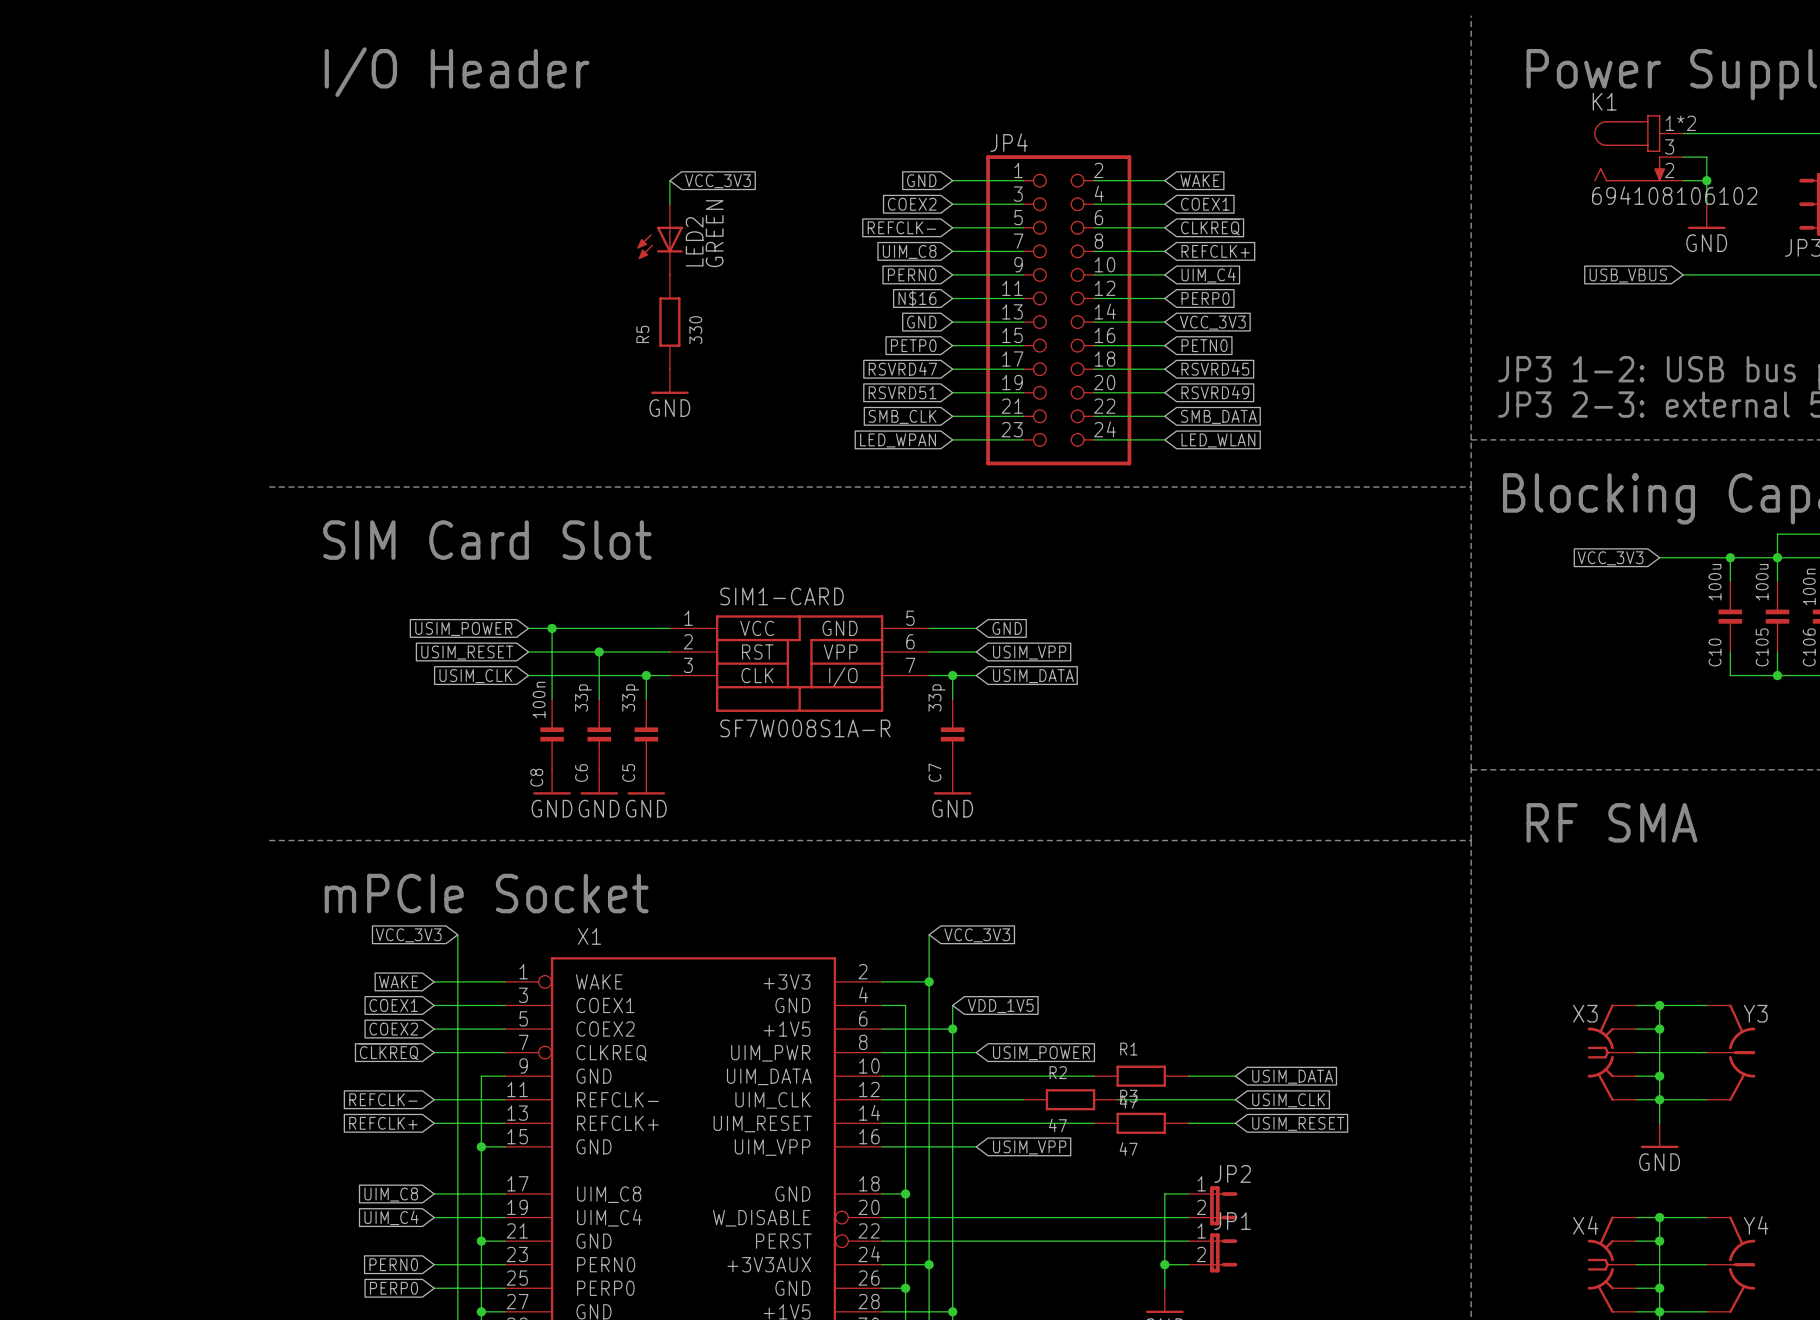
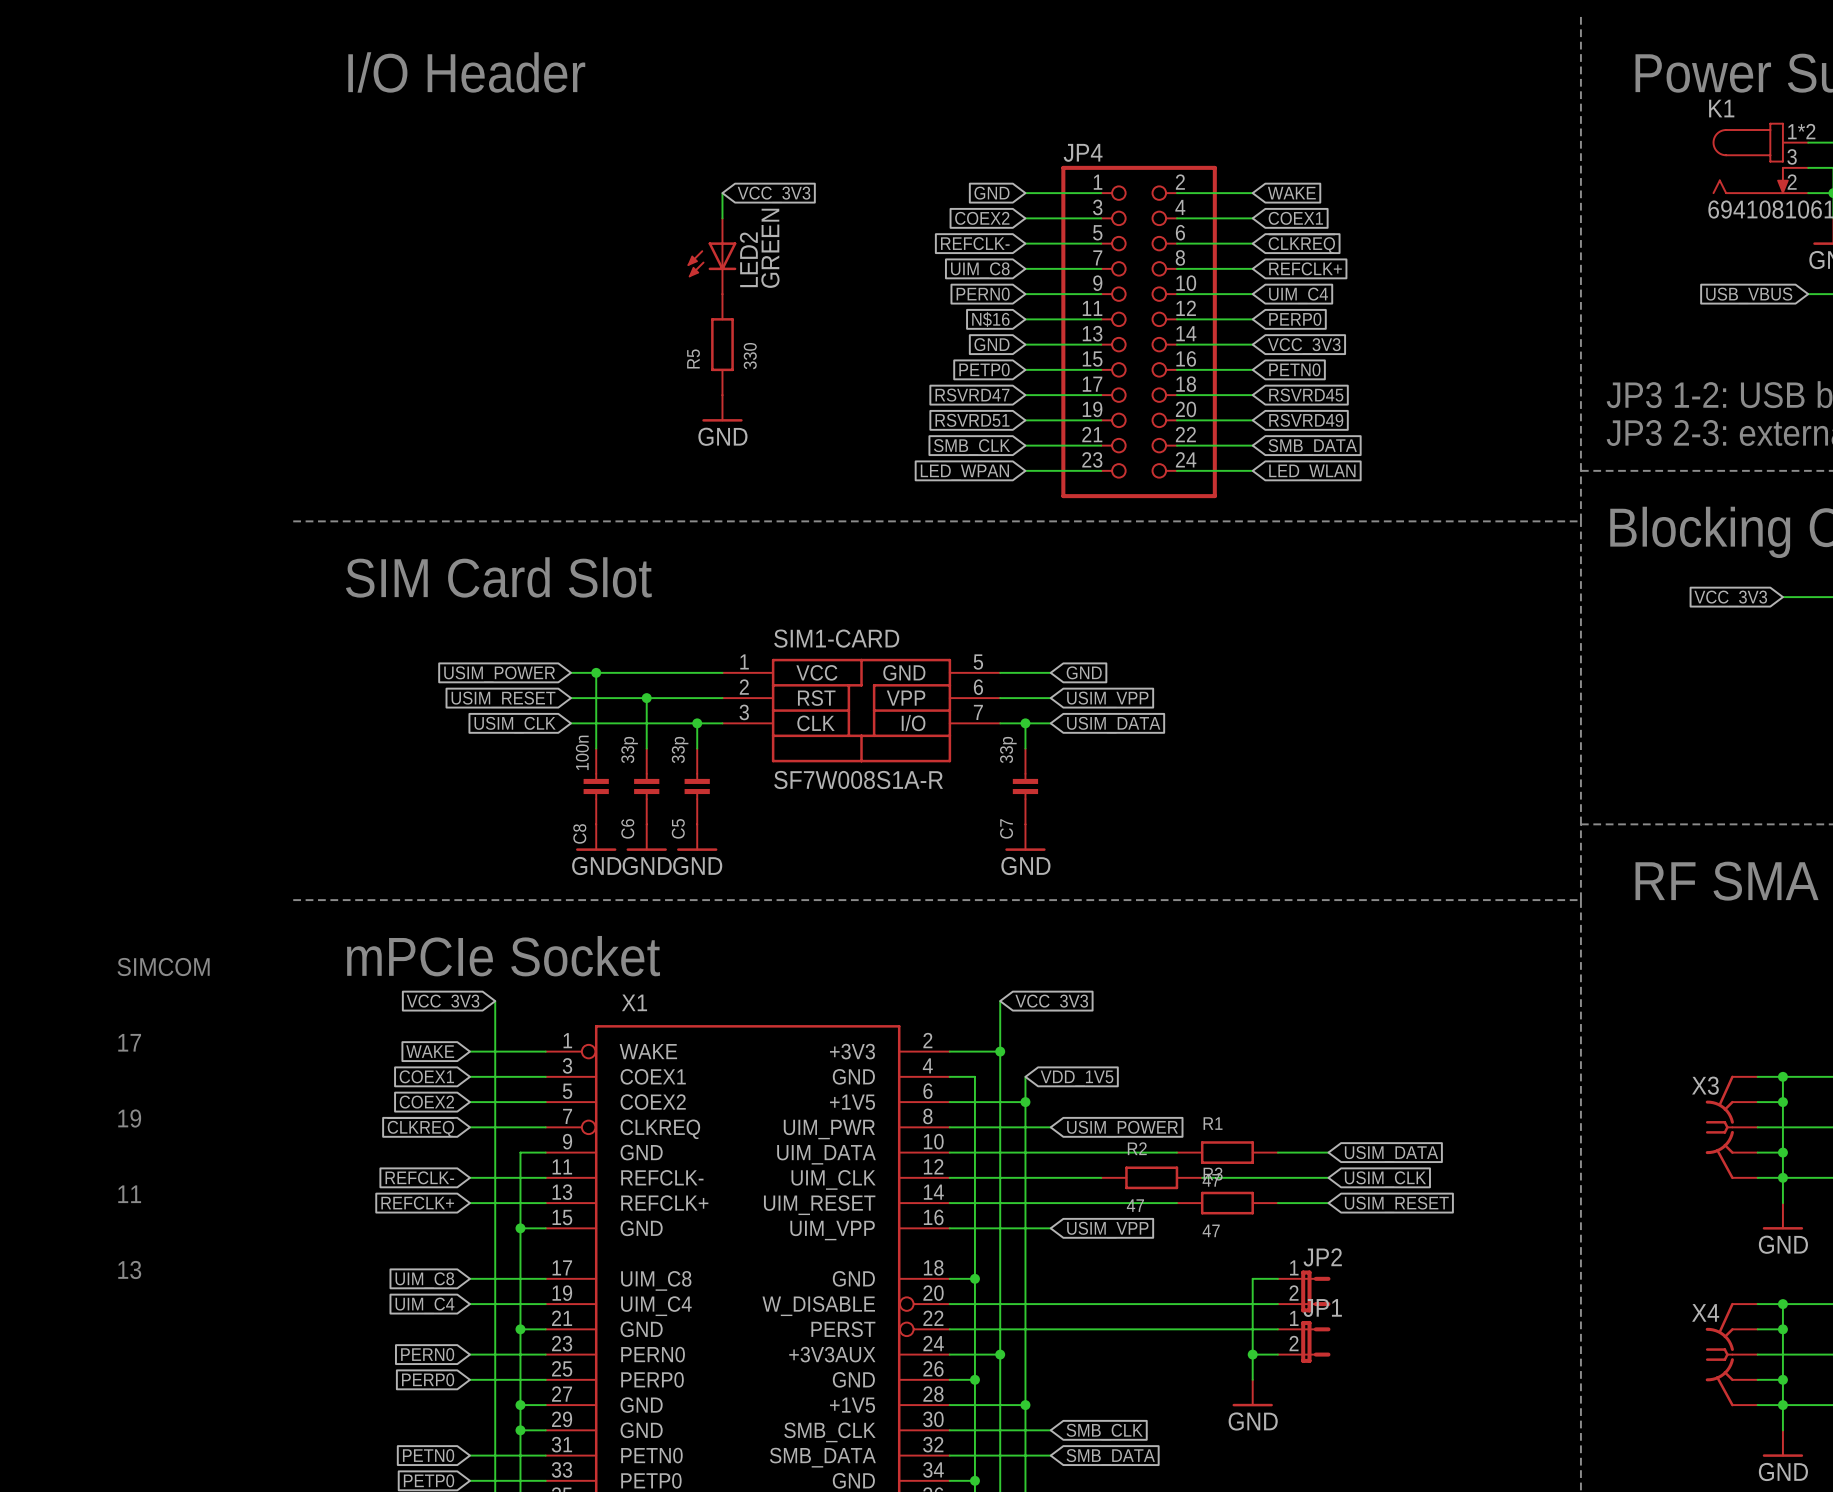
text: none -> SIMCOM (163, 967)
text: none -> 17 (129, 1042)
text: none -> 19 (129, 1118)
text: none -> 11 (129, 1194)
text: none -> 13 (129, 1270)

